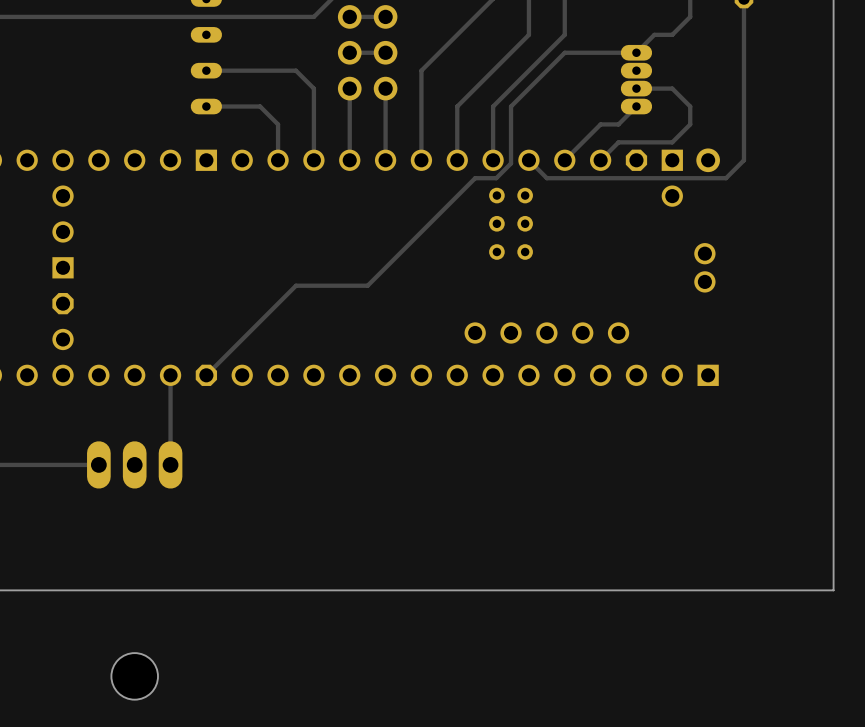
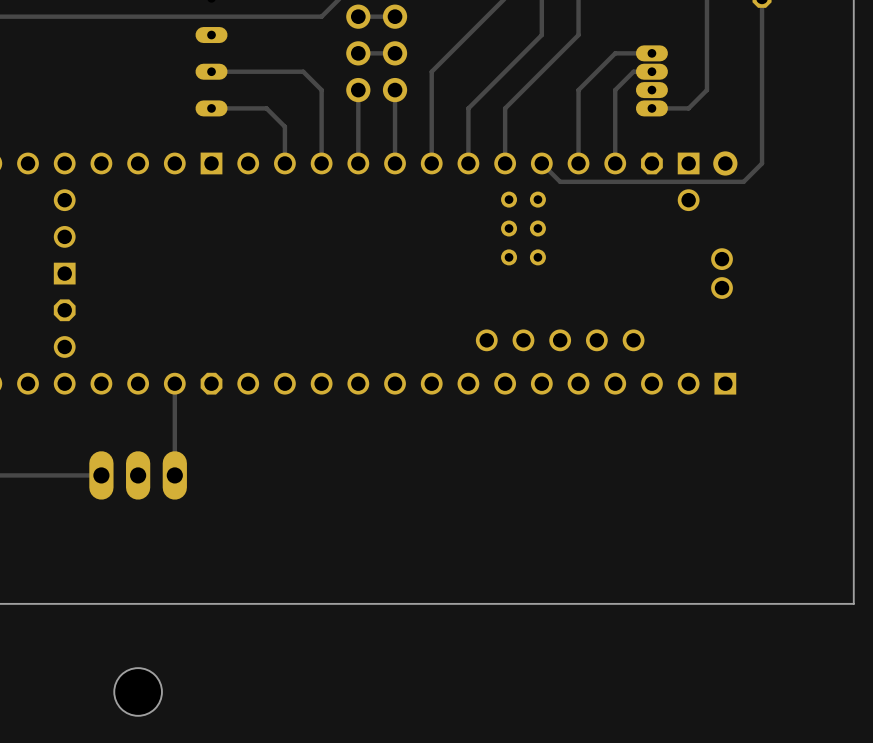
track: (690, 16) (672, 34) (654, 34) (636, 52) -> (706, 16) (706, 90) (688, 108) (651, 108)
track: (600, 52) (564, 52) (511, 106) (511, 163) (496, 178) (475, 178) (367, 285) (295, 285) (206, 375) -> none
track: (636, 88) (672, 88) (690, 106) (690, 124) (672, 142) (618, 142) (600, 160) -> (651, 71) (633, 71) (615, 90) (615, 163)
track: (636, 106) (618, 124) (600, 124) (564, 160) -> (615, 53) (578, 90) (578, 163)

